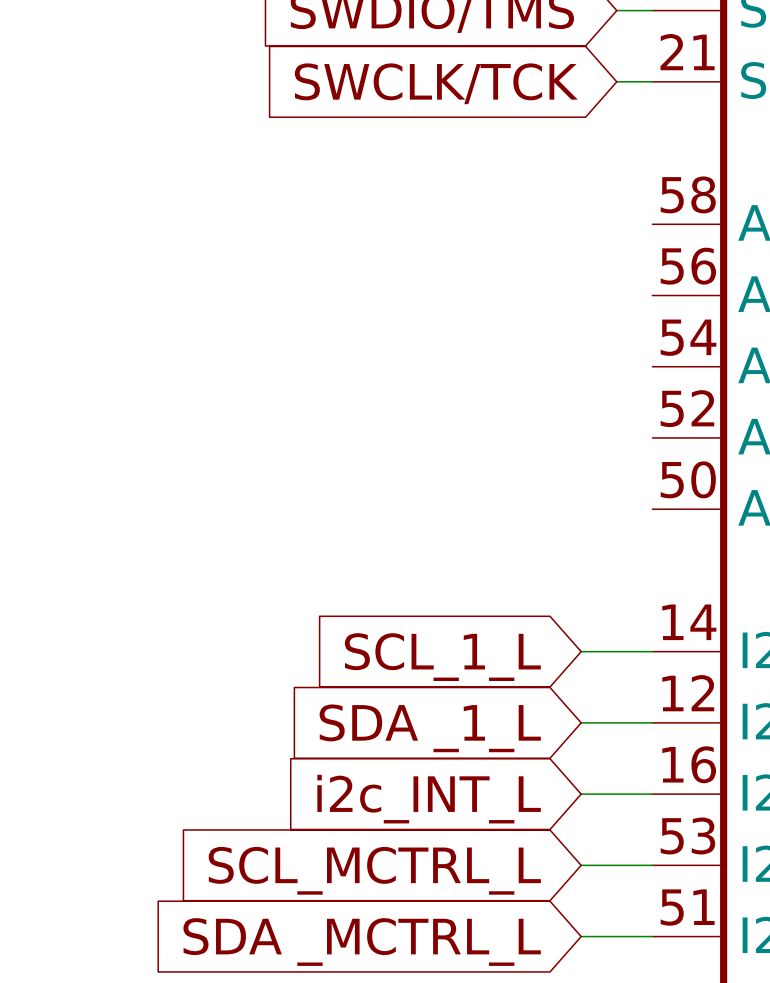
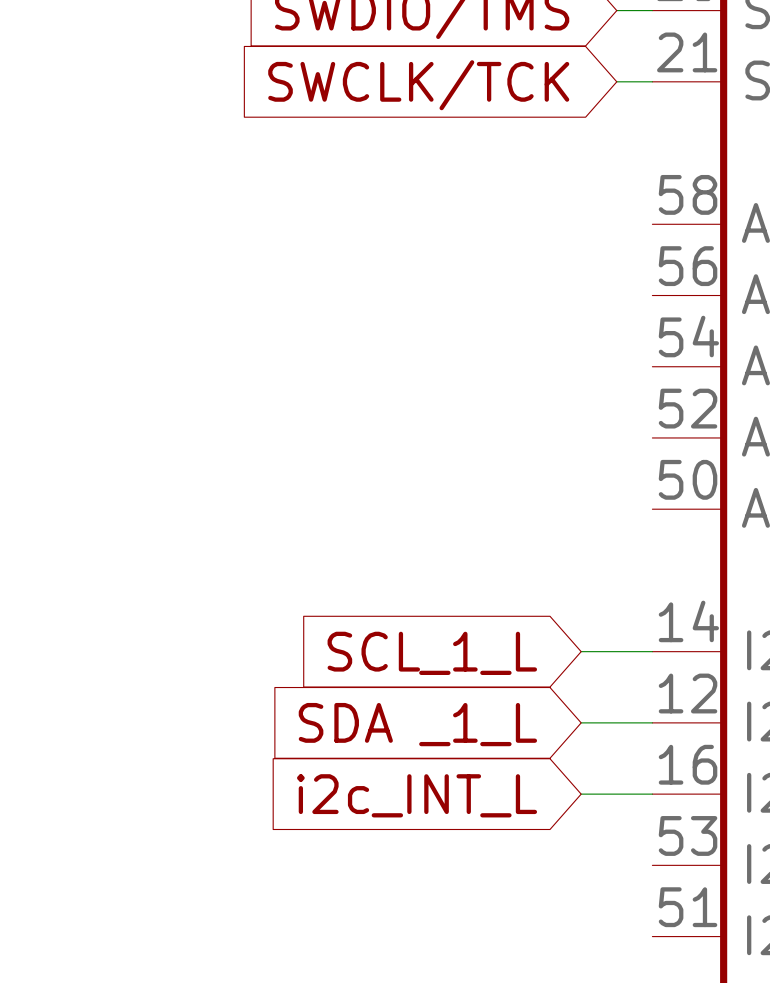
wire: (581, 865) (652, 865) -> none
global label: SCL_MCTRL_L (374, 870) -> none
wire: (581, 936) (652, 936) -> none
global label: SDA _MCTRL_L (362, 942) -> none

